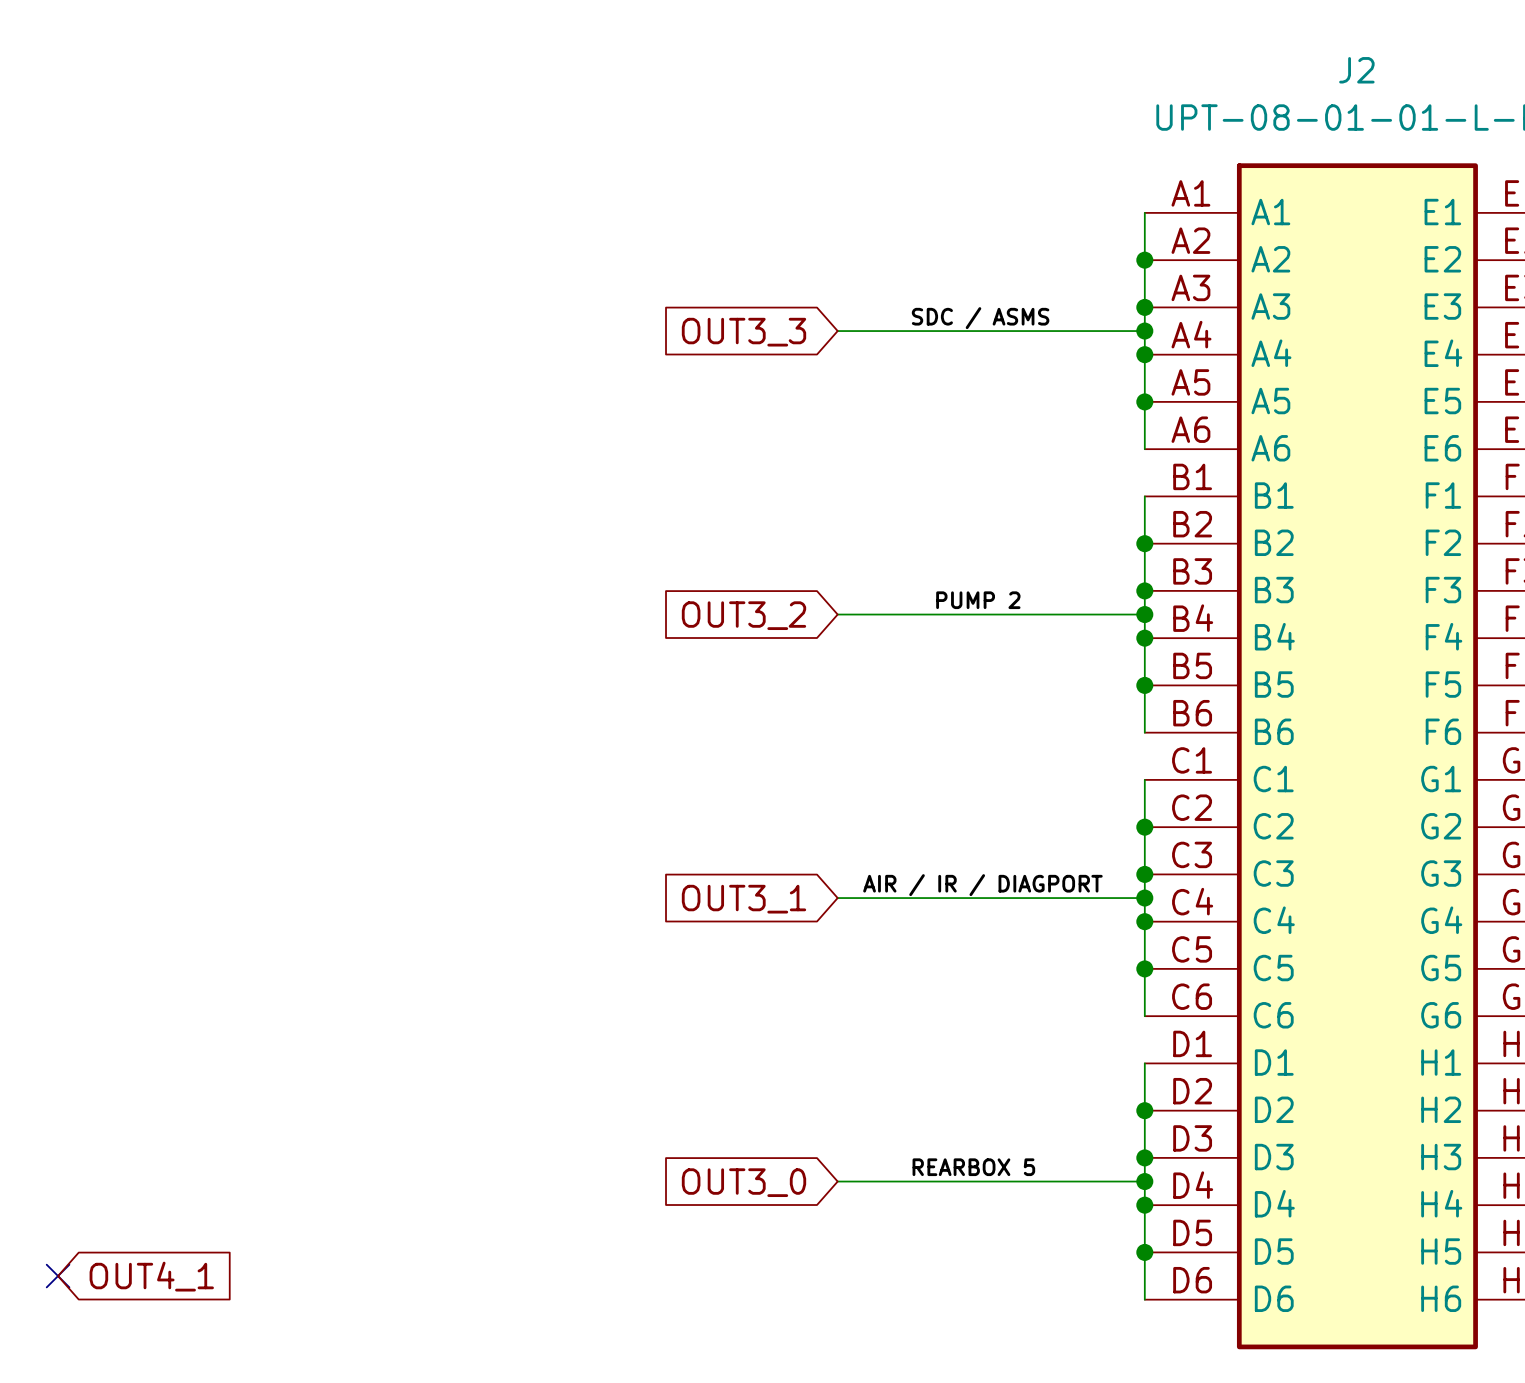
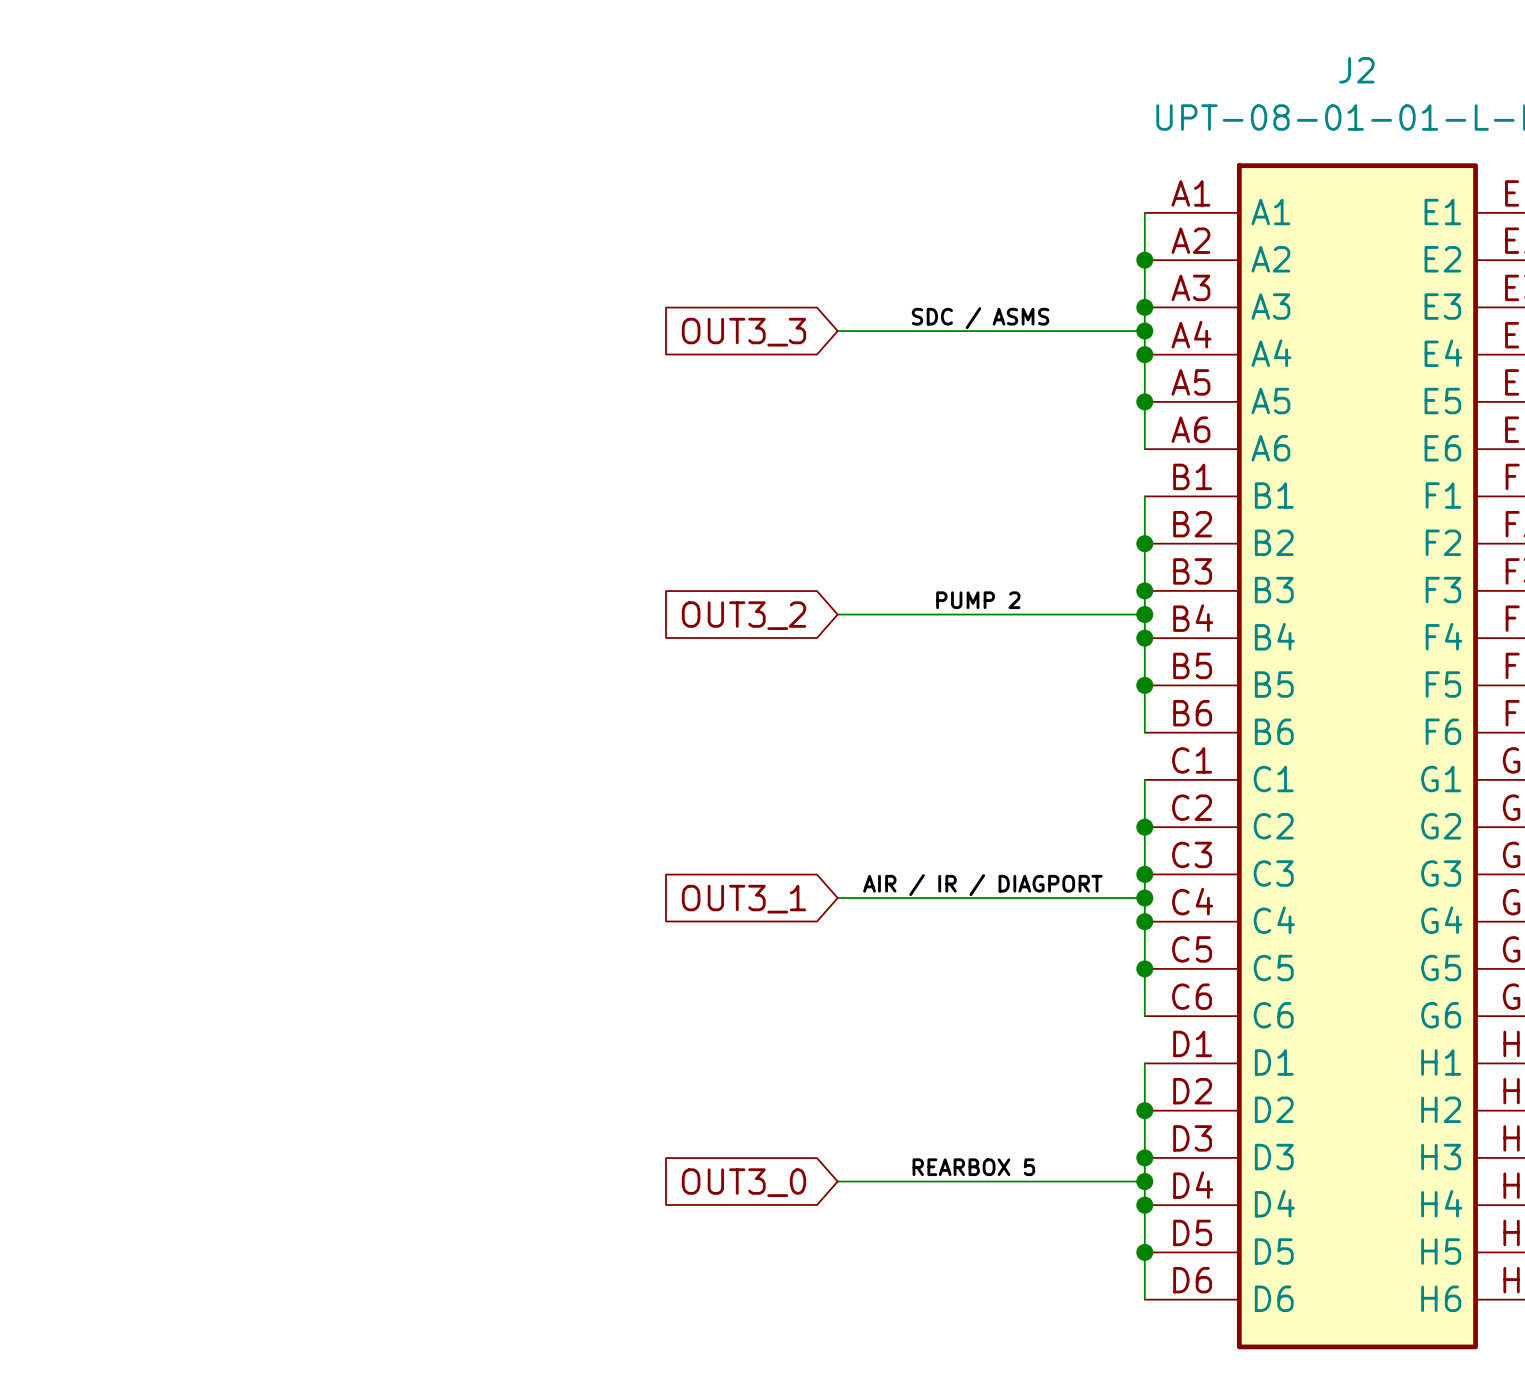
no-connect mark: (58, 1276) -> none
global label: OUT4_1 (151, 1276) -> none

